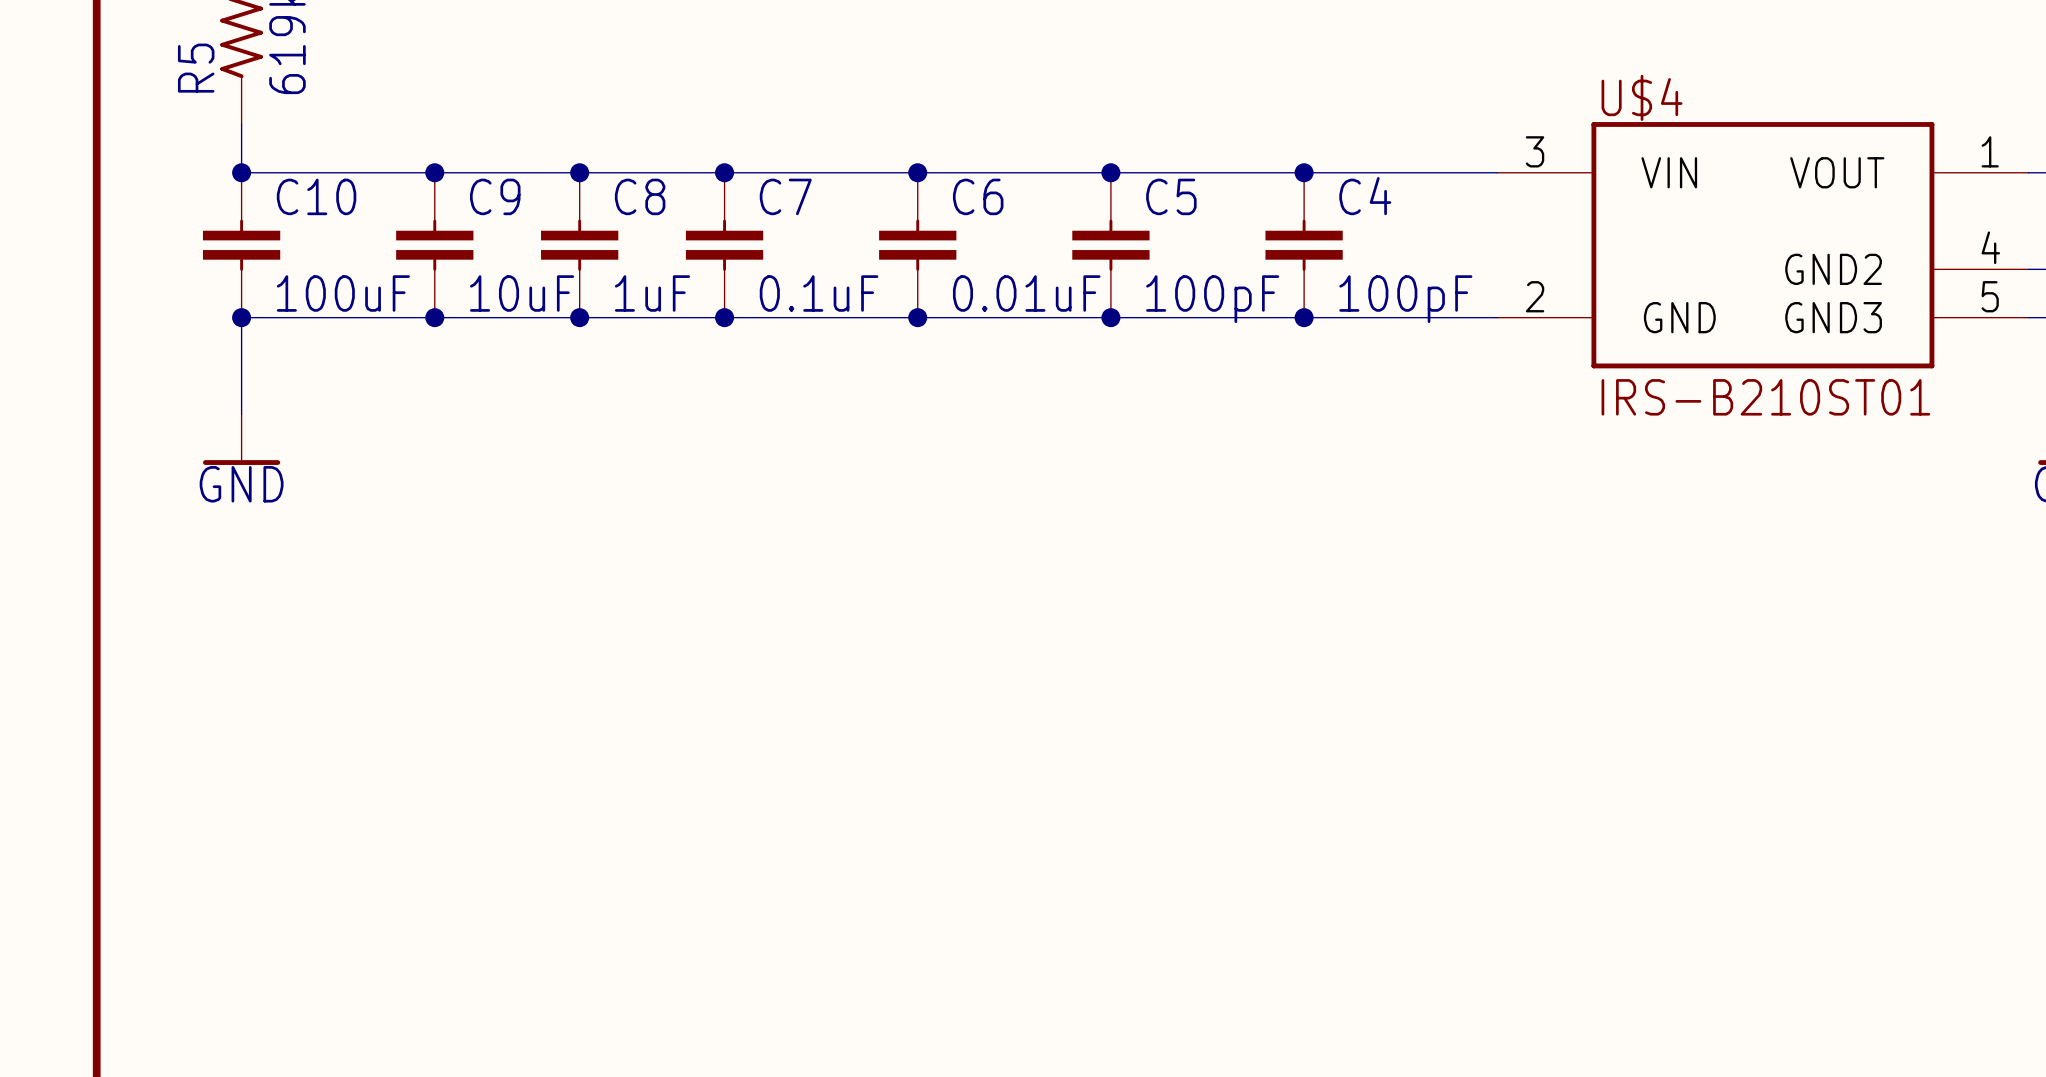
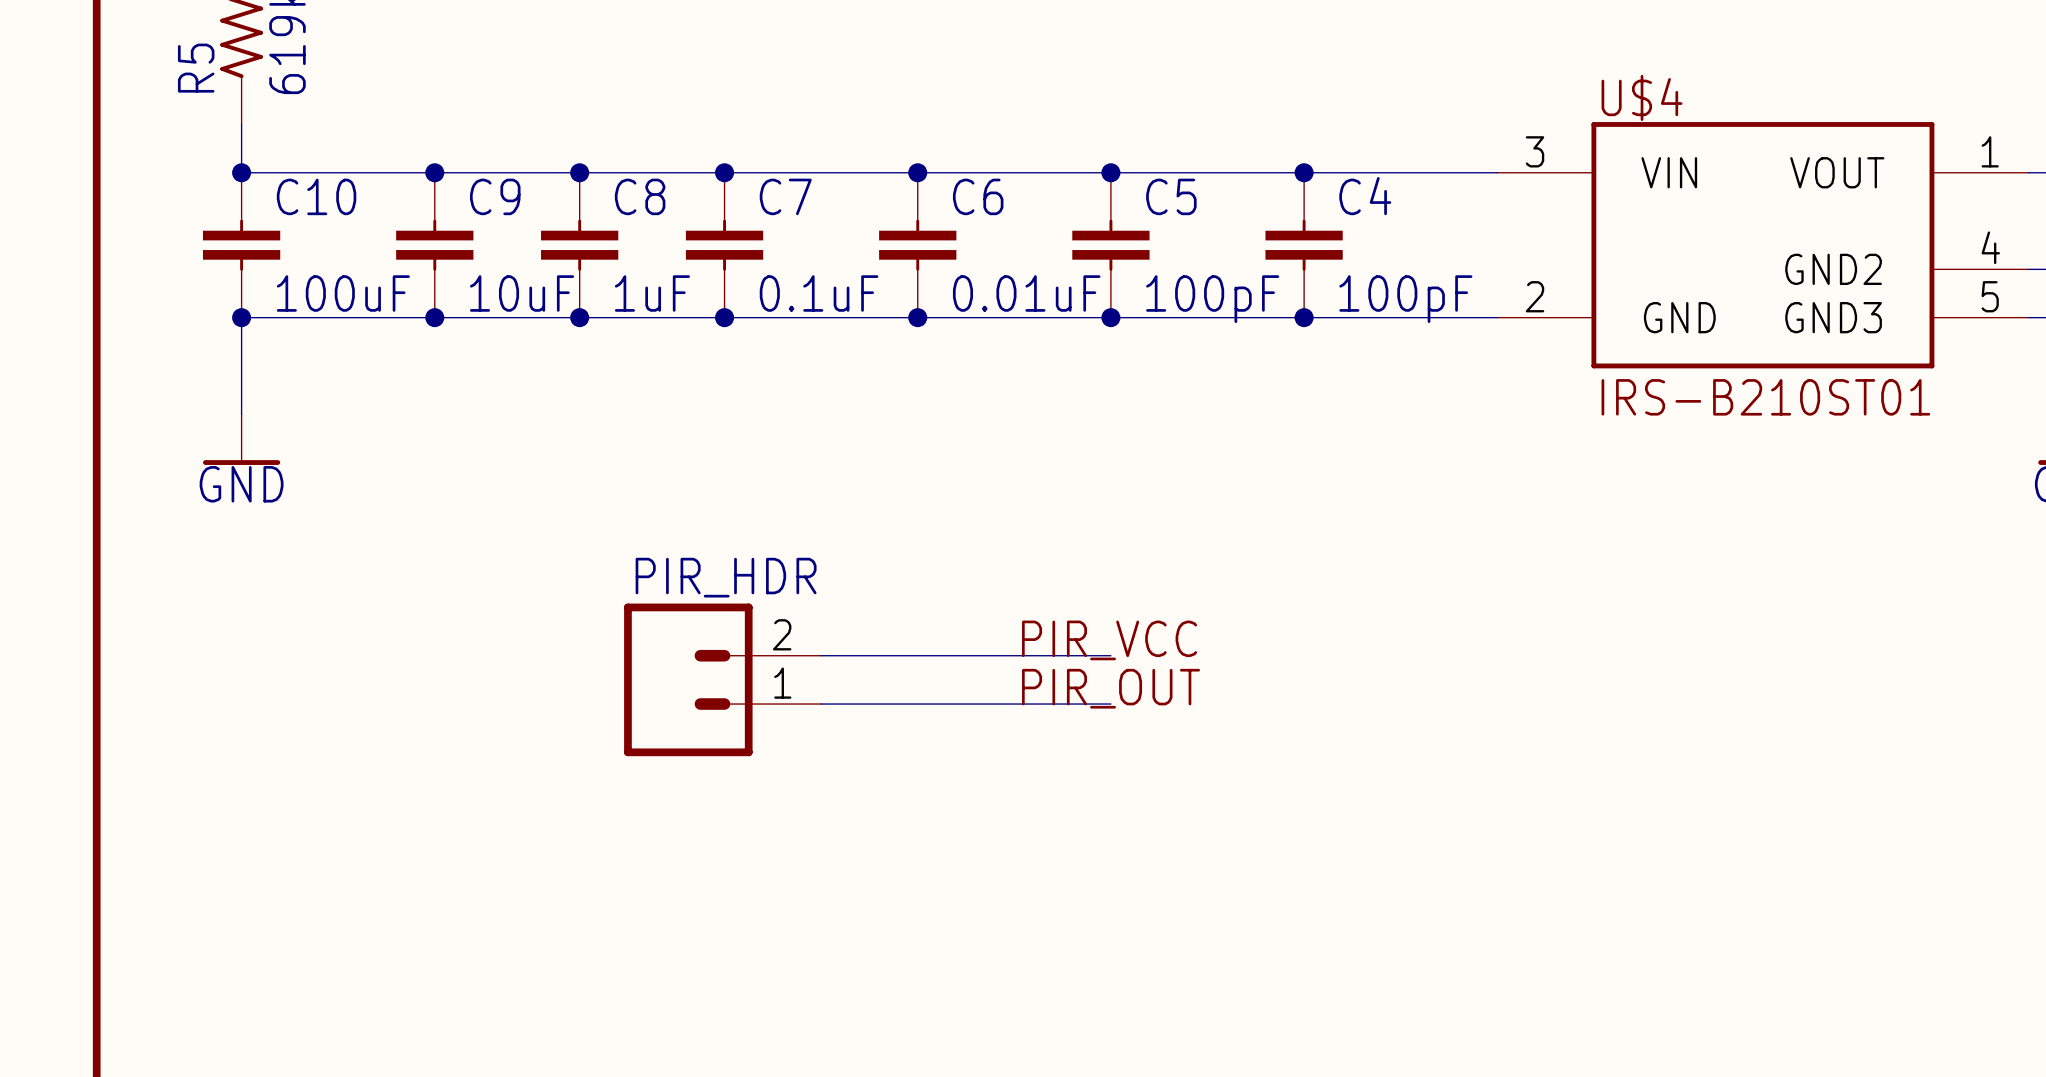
label: none -> PIR_VCC (1109, 640)
wire: none -> (821, 655) (1110, 655)
PIR_HDR: none -> (722, 679)
label: none -> PIR_OUT (1111, 688)
wire: none -> (821, 704) (1110, 704)

